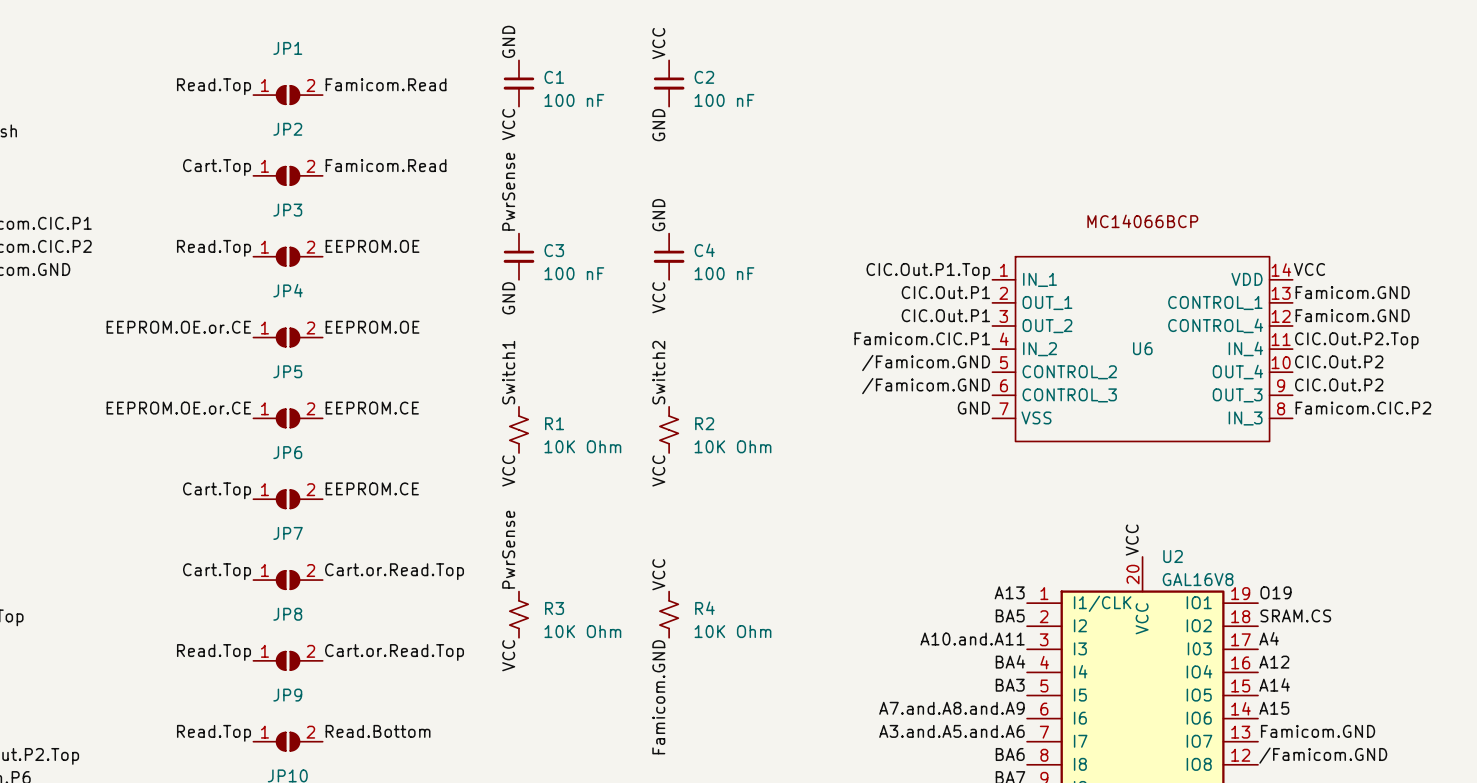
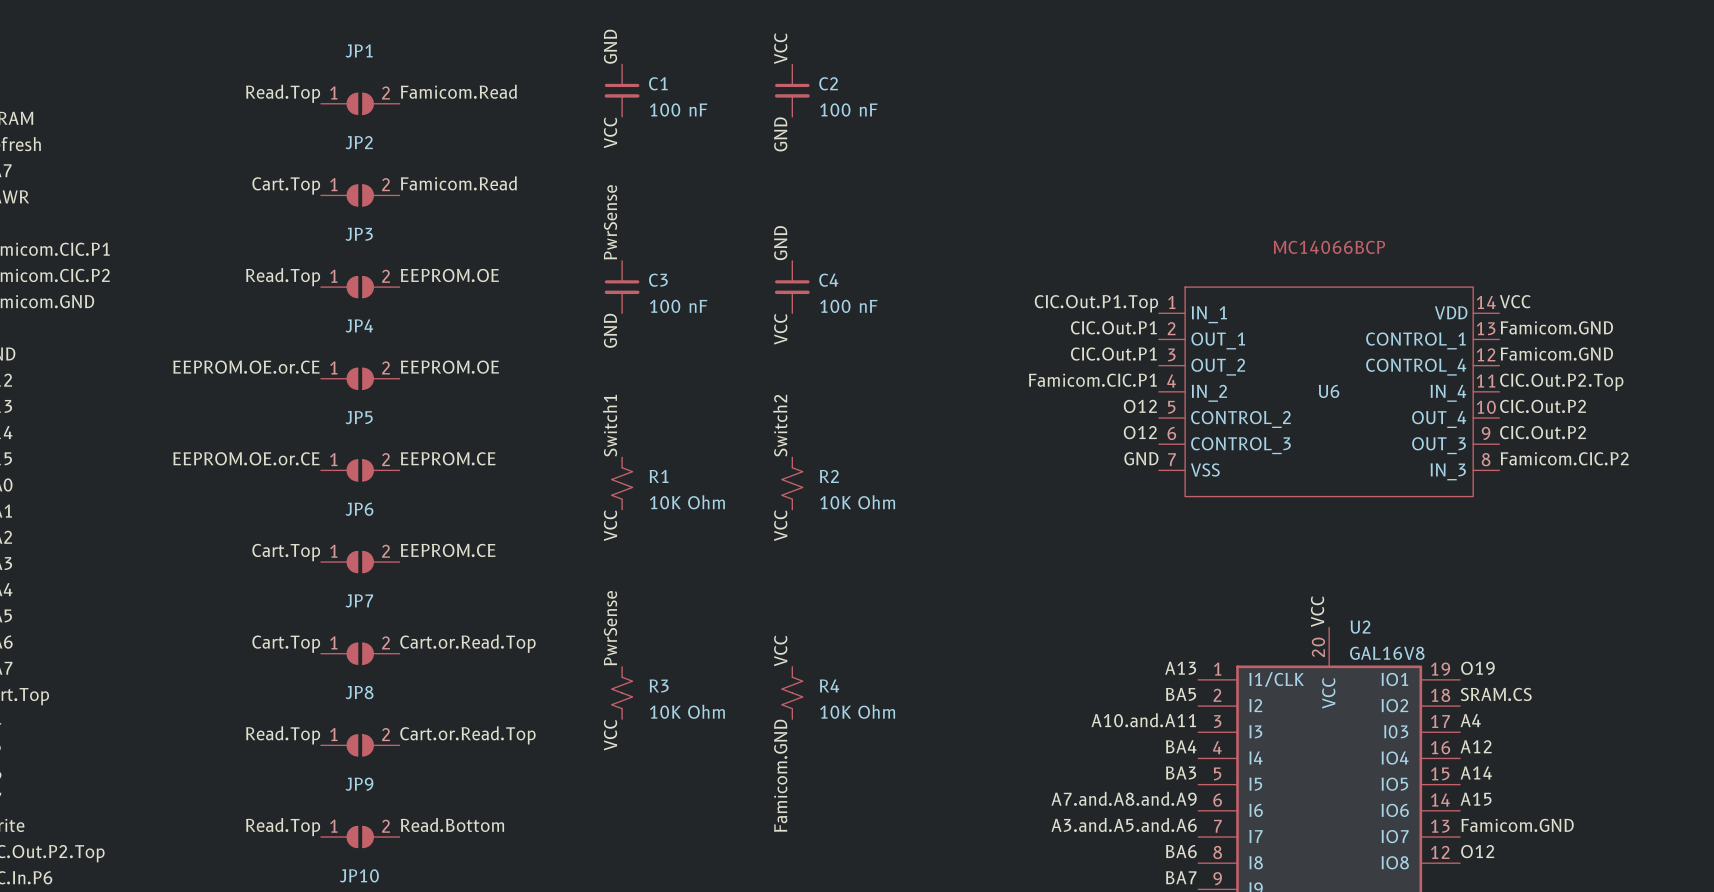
label: /Famicom.GND (926, 362) -> O12 (1140, 406)
label: /Famicom.GND (926, 386) -> O12 (1140, 432)
label: /Famicom.GND (1323, 755) -> O12 (1477, 851)

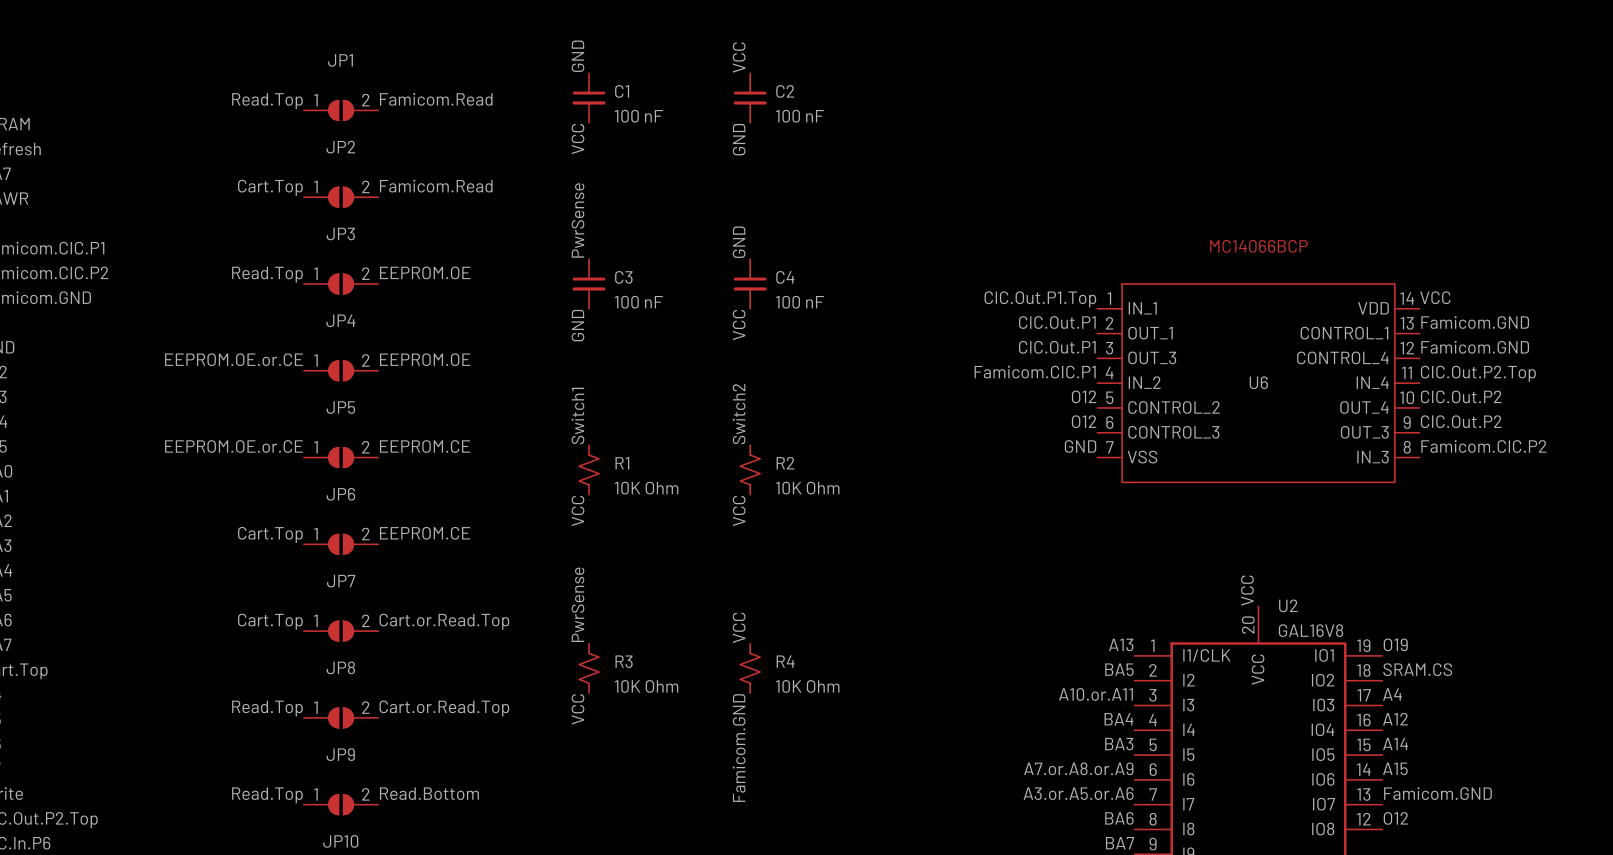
U6 pin name: OUT_2 (1218, 367) -> OUT_3 (1152, 357)
label: A10.and.A11 (1143, 720) -> A10.or.A11 (1095, 694)
label: A7.and.A8.and.A9 (1124, 798) -> A7.or.A8.or.A9 (1078, 768)
label: A3.and.A5.and.A6 (1124, 824) -> A3.or.A5.or.A6 (1078, 793)

